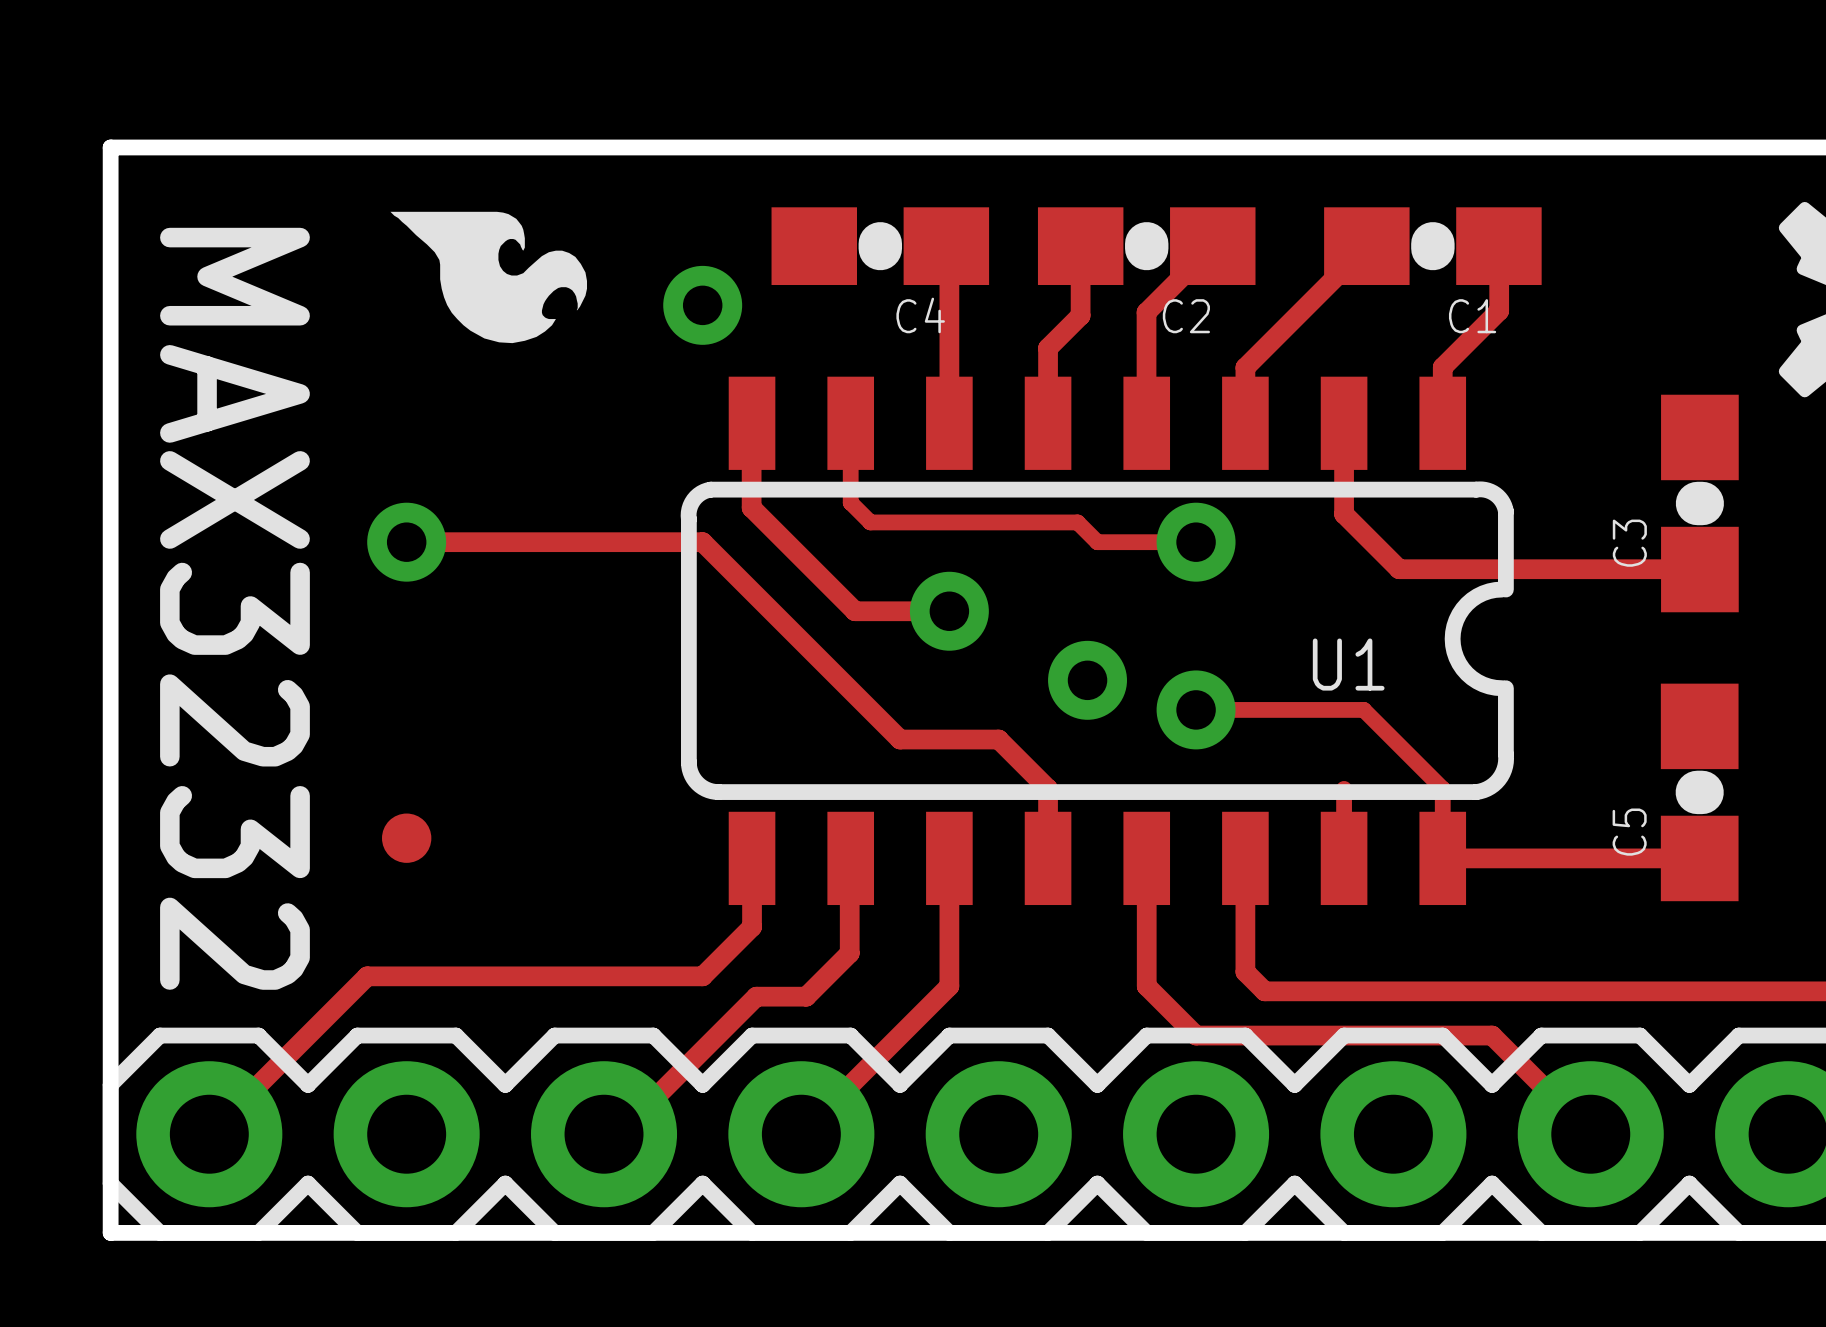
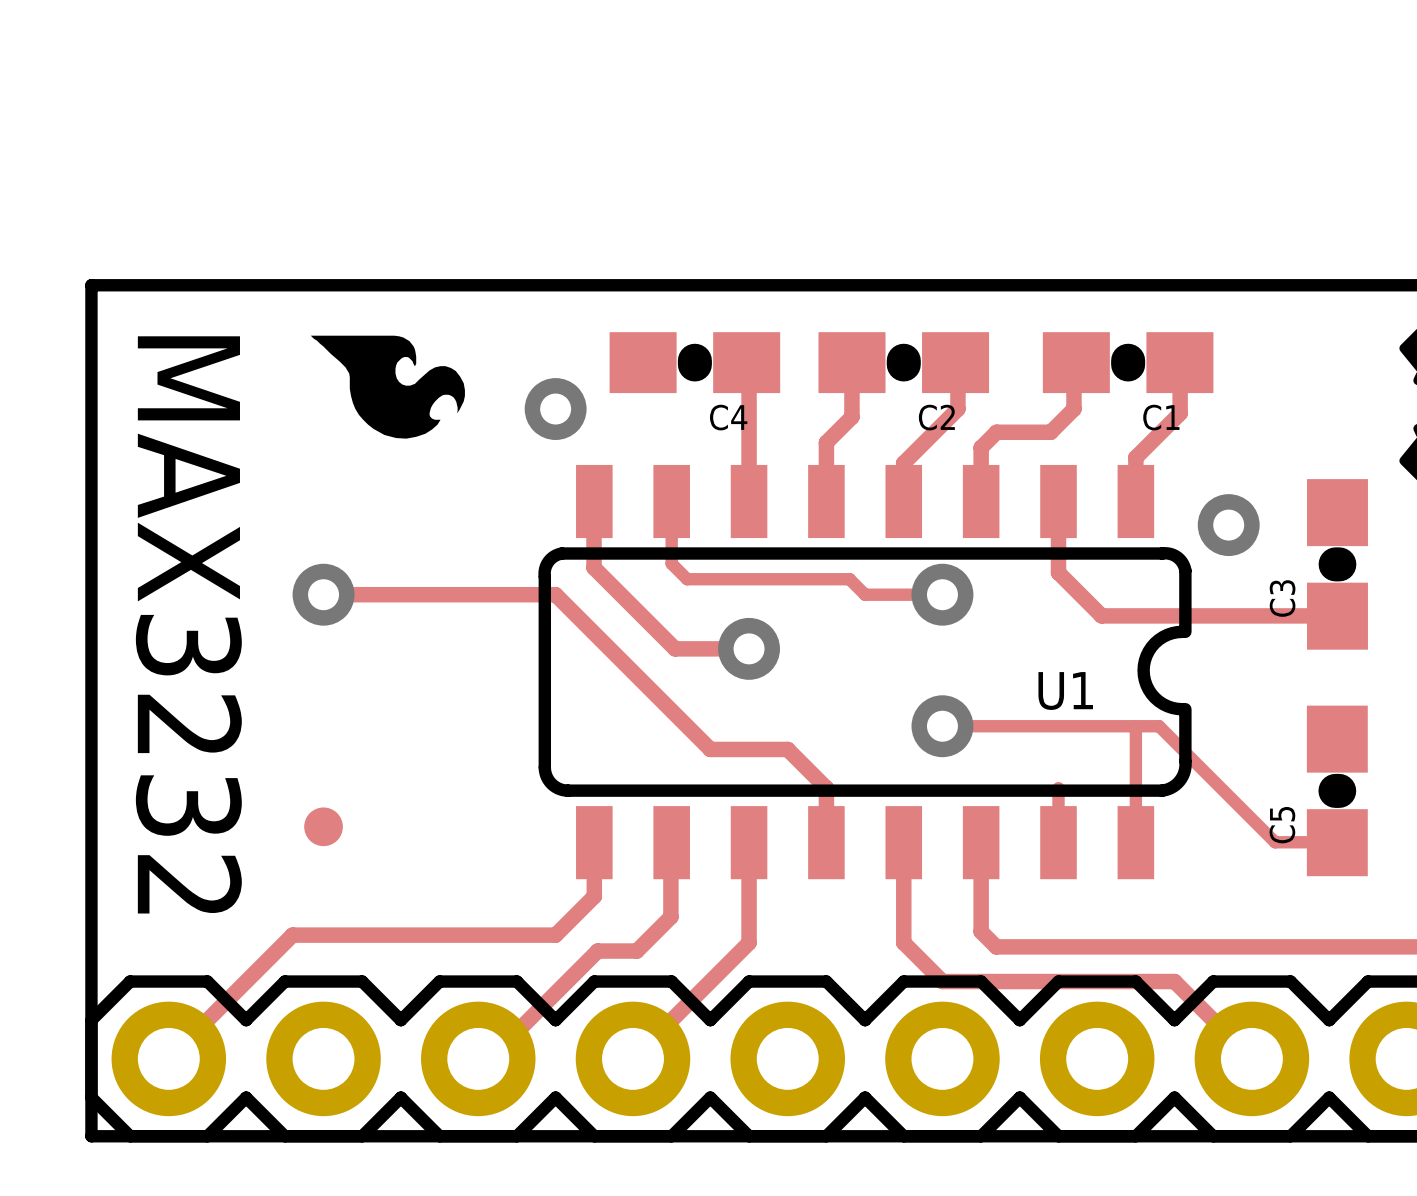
track: (1212, 246) (1146, 312) (1146, 374) -> (955, 362) (957, 364) (957, 409) (903, 463)
track: (1363, 249) (1245, 367) -> (1073, 364) (1073, 409) (1050, 432) (996, 432) (981, 447) (981, 457)
via: none -> (1228, 525)
via: (1087, 680) -> none
track: (1363, 709) (1442, 788) -> (1135, 726) (1135, 788)
track: (1442, 858) (1699, 858) -> (1073, 726) (1159, 726) (1275, 842) (1336, 842)

